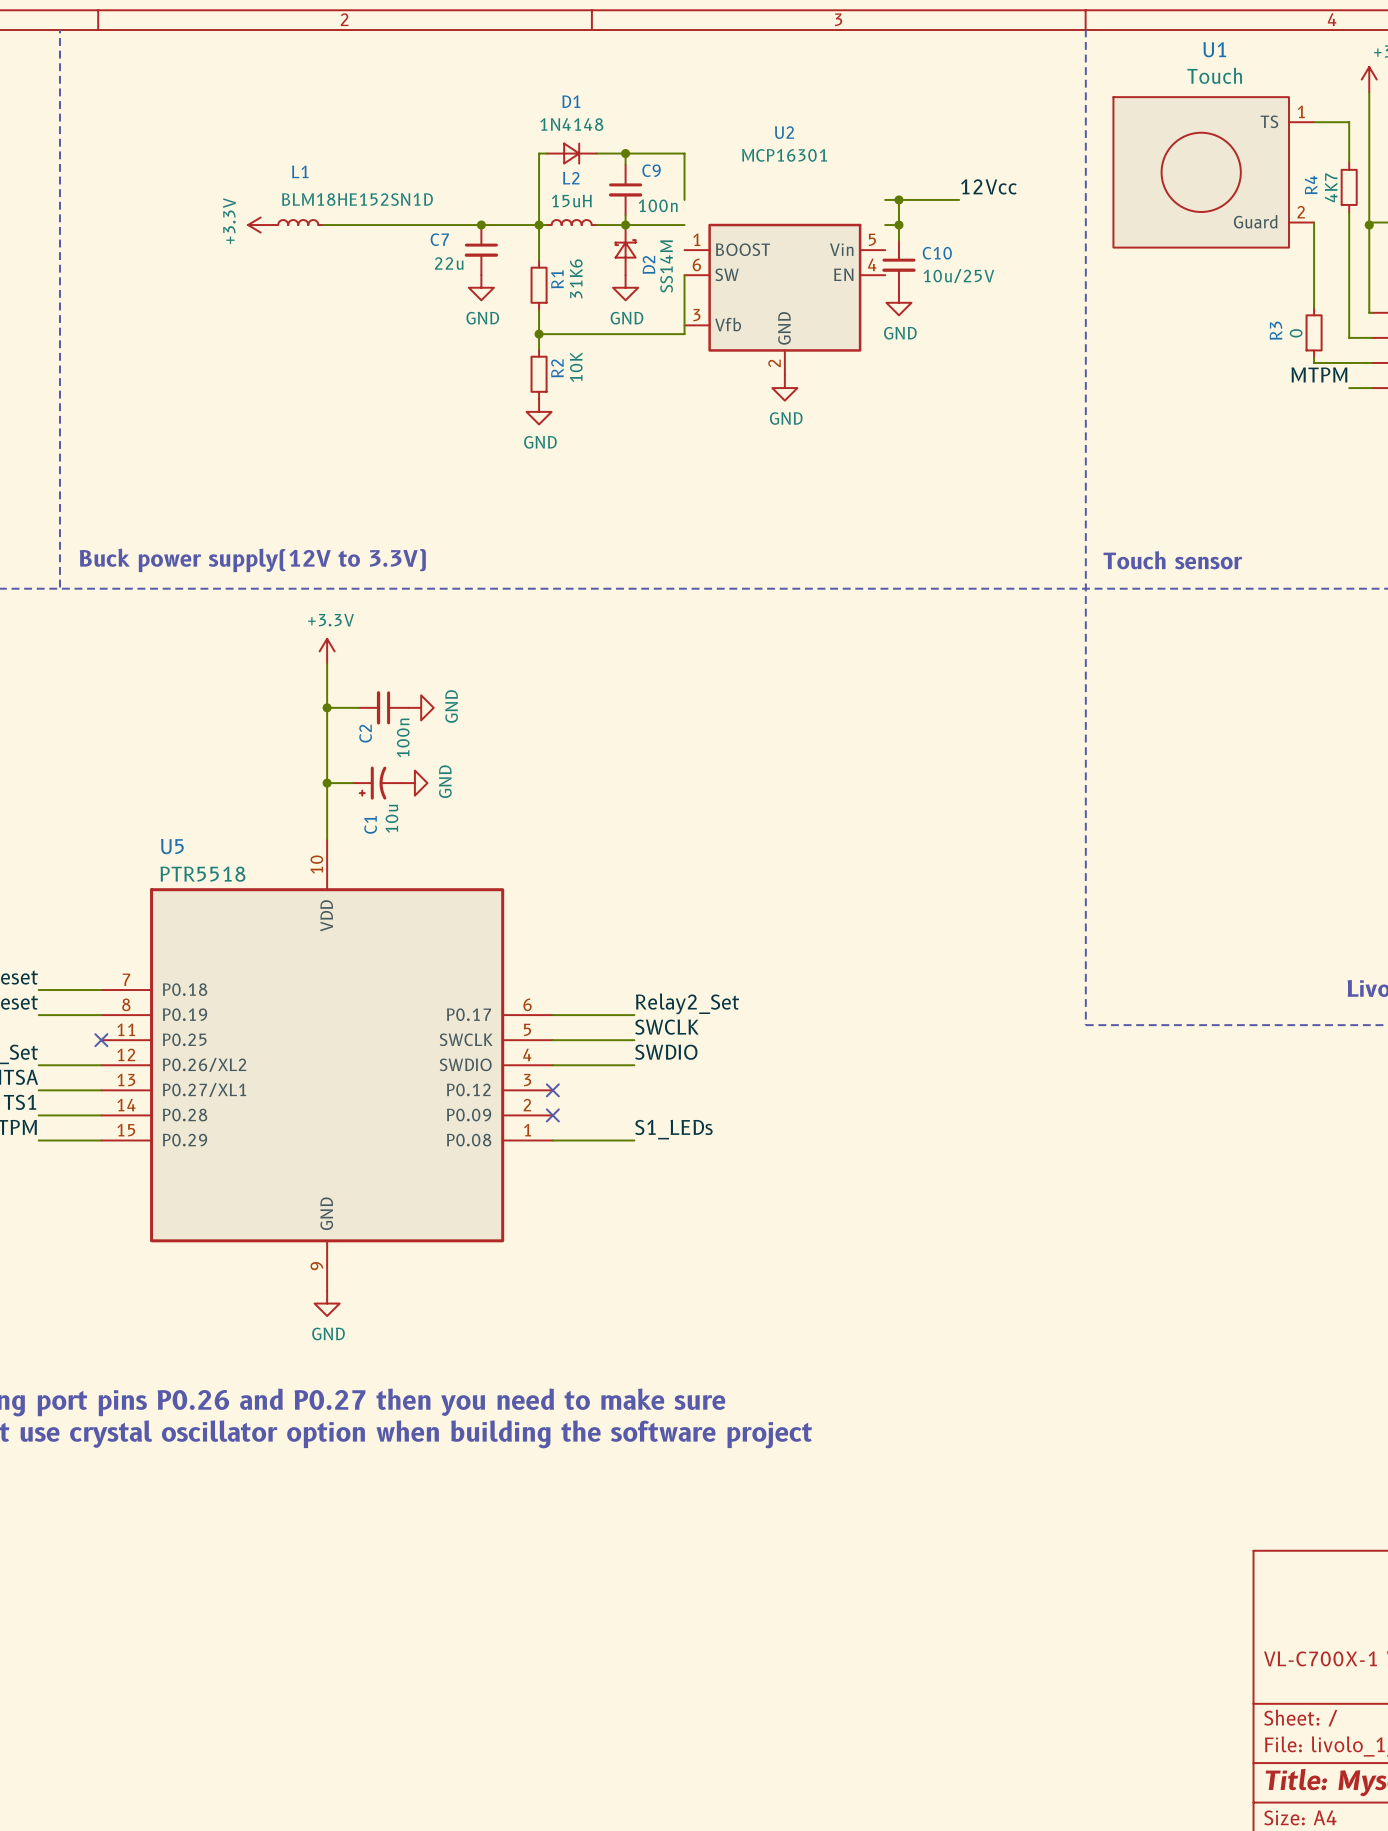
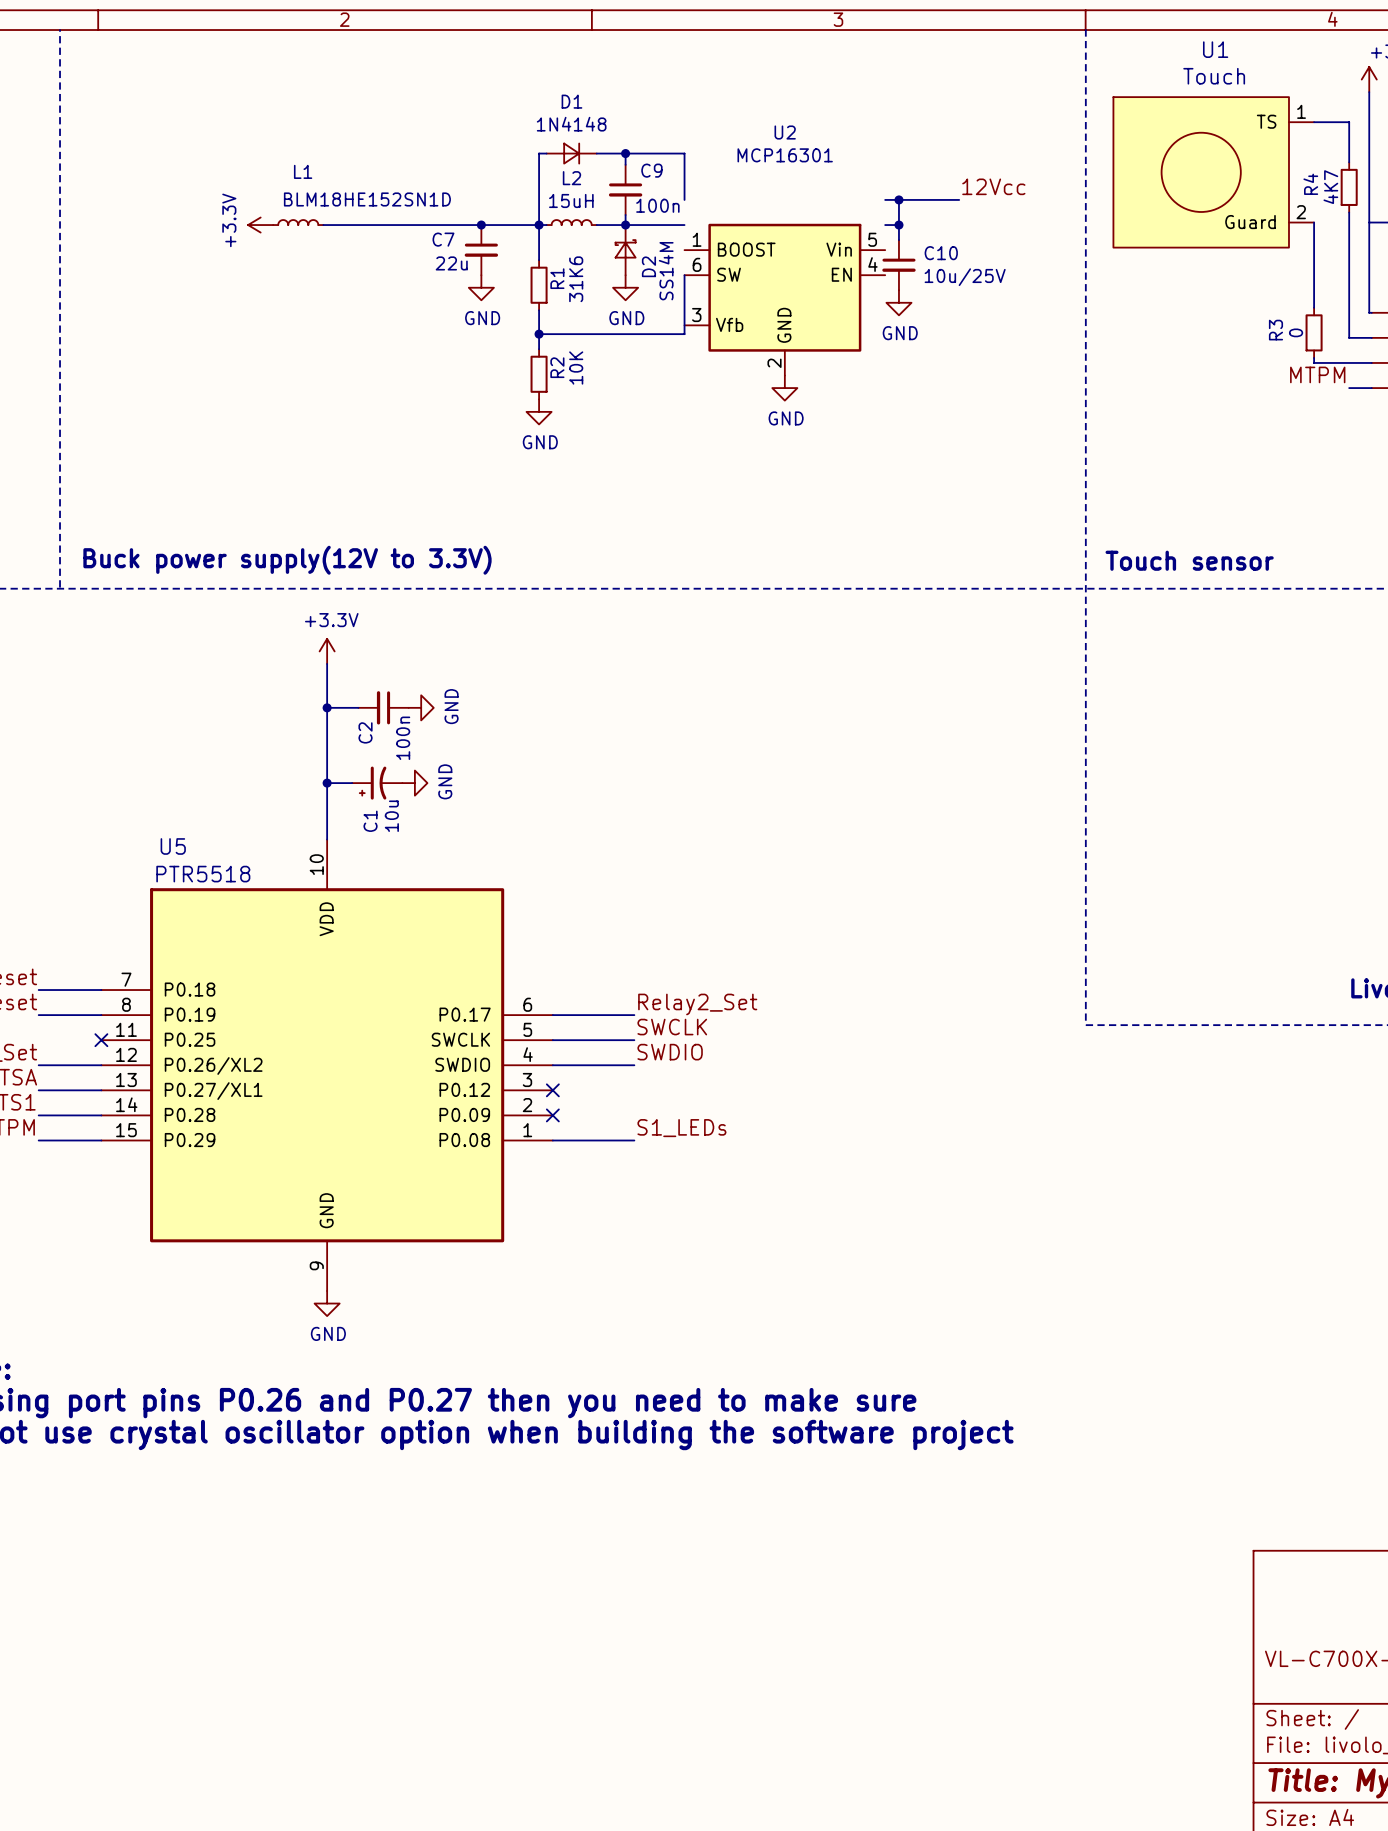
junction: (1369, 225) -> none

